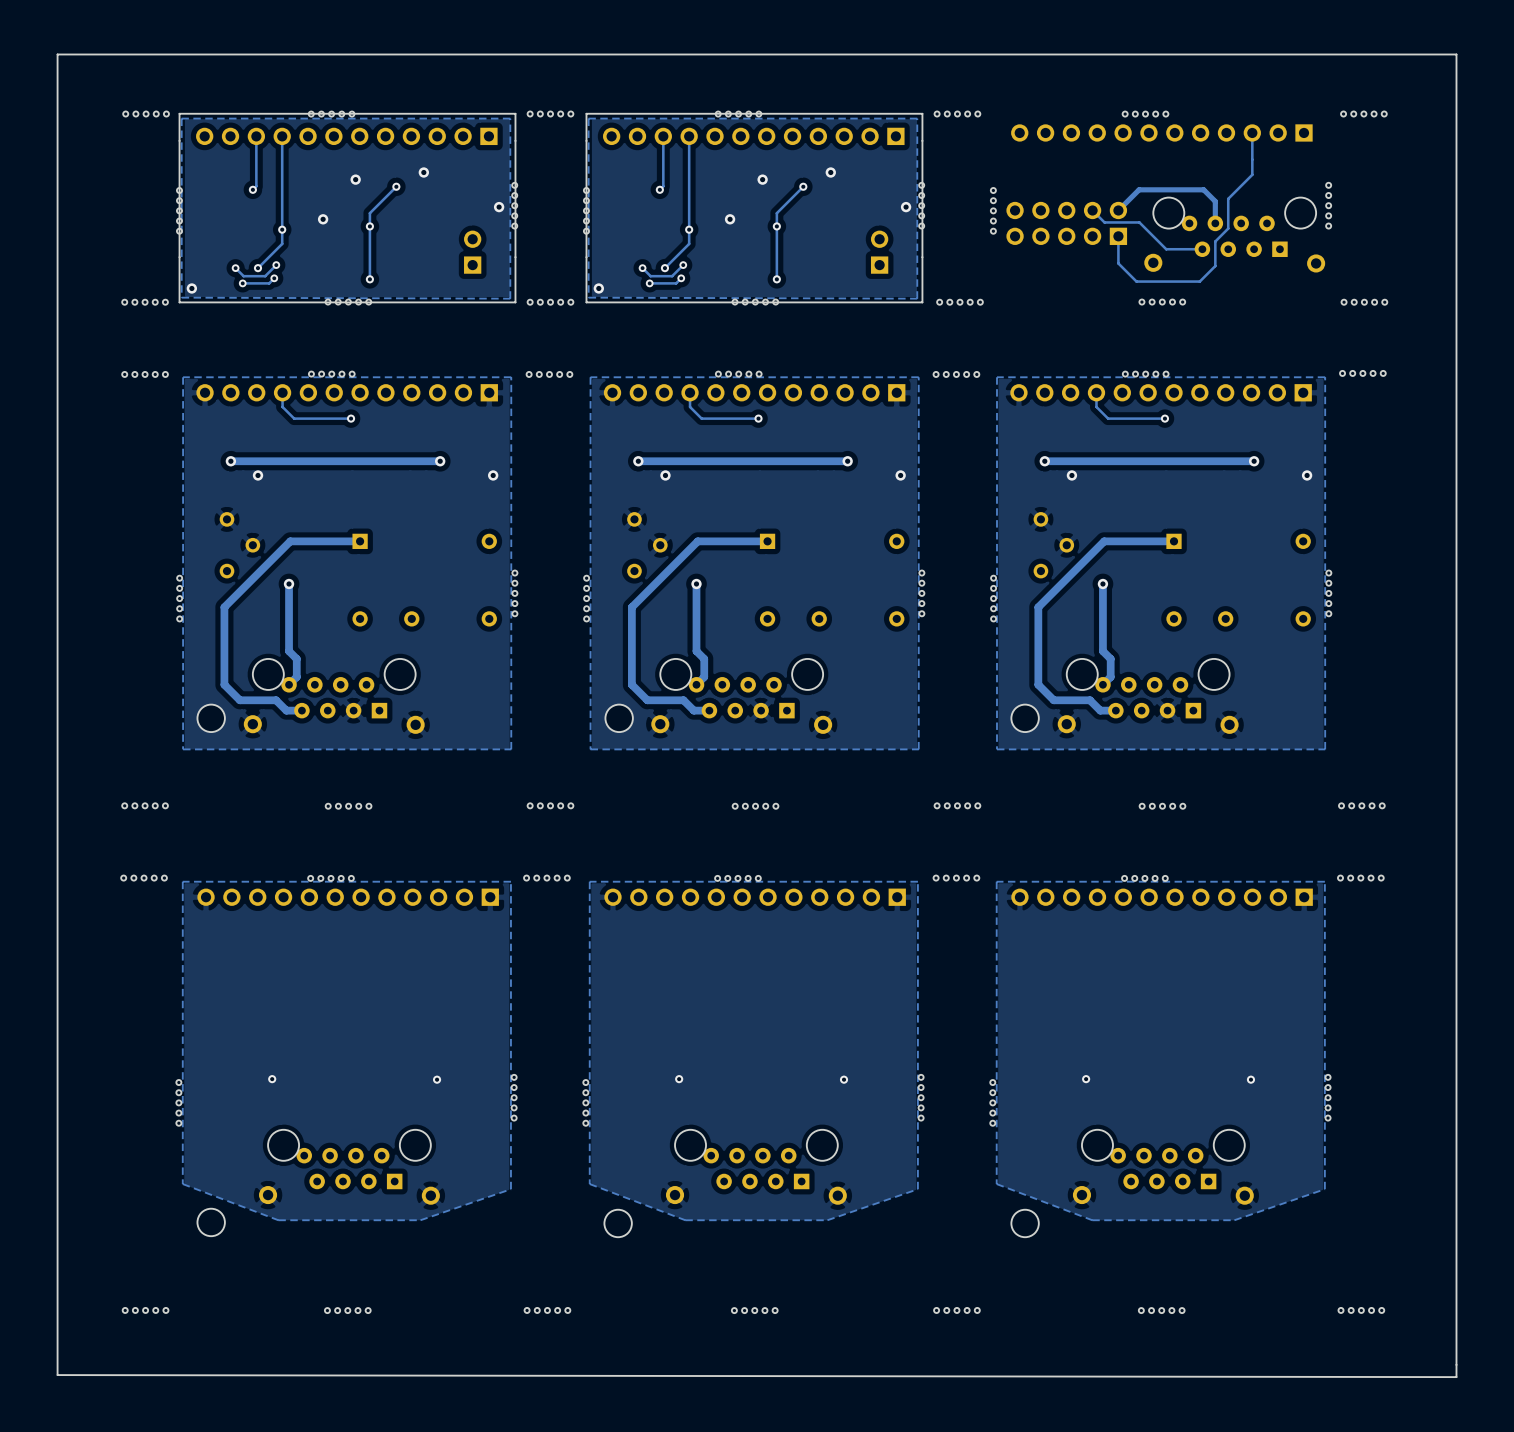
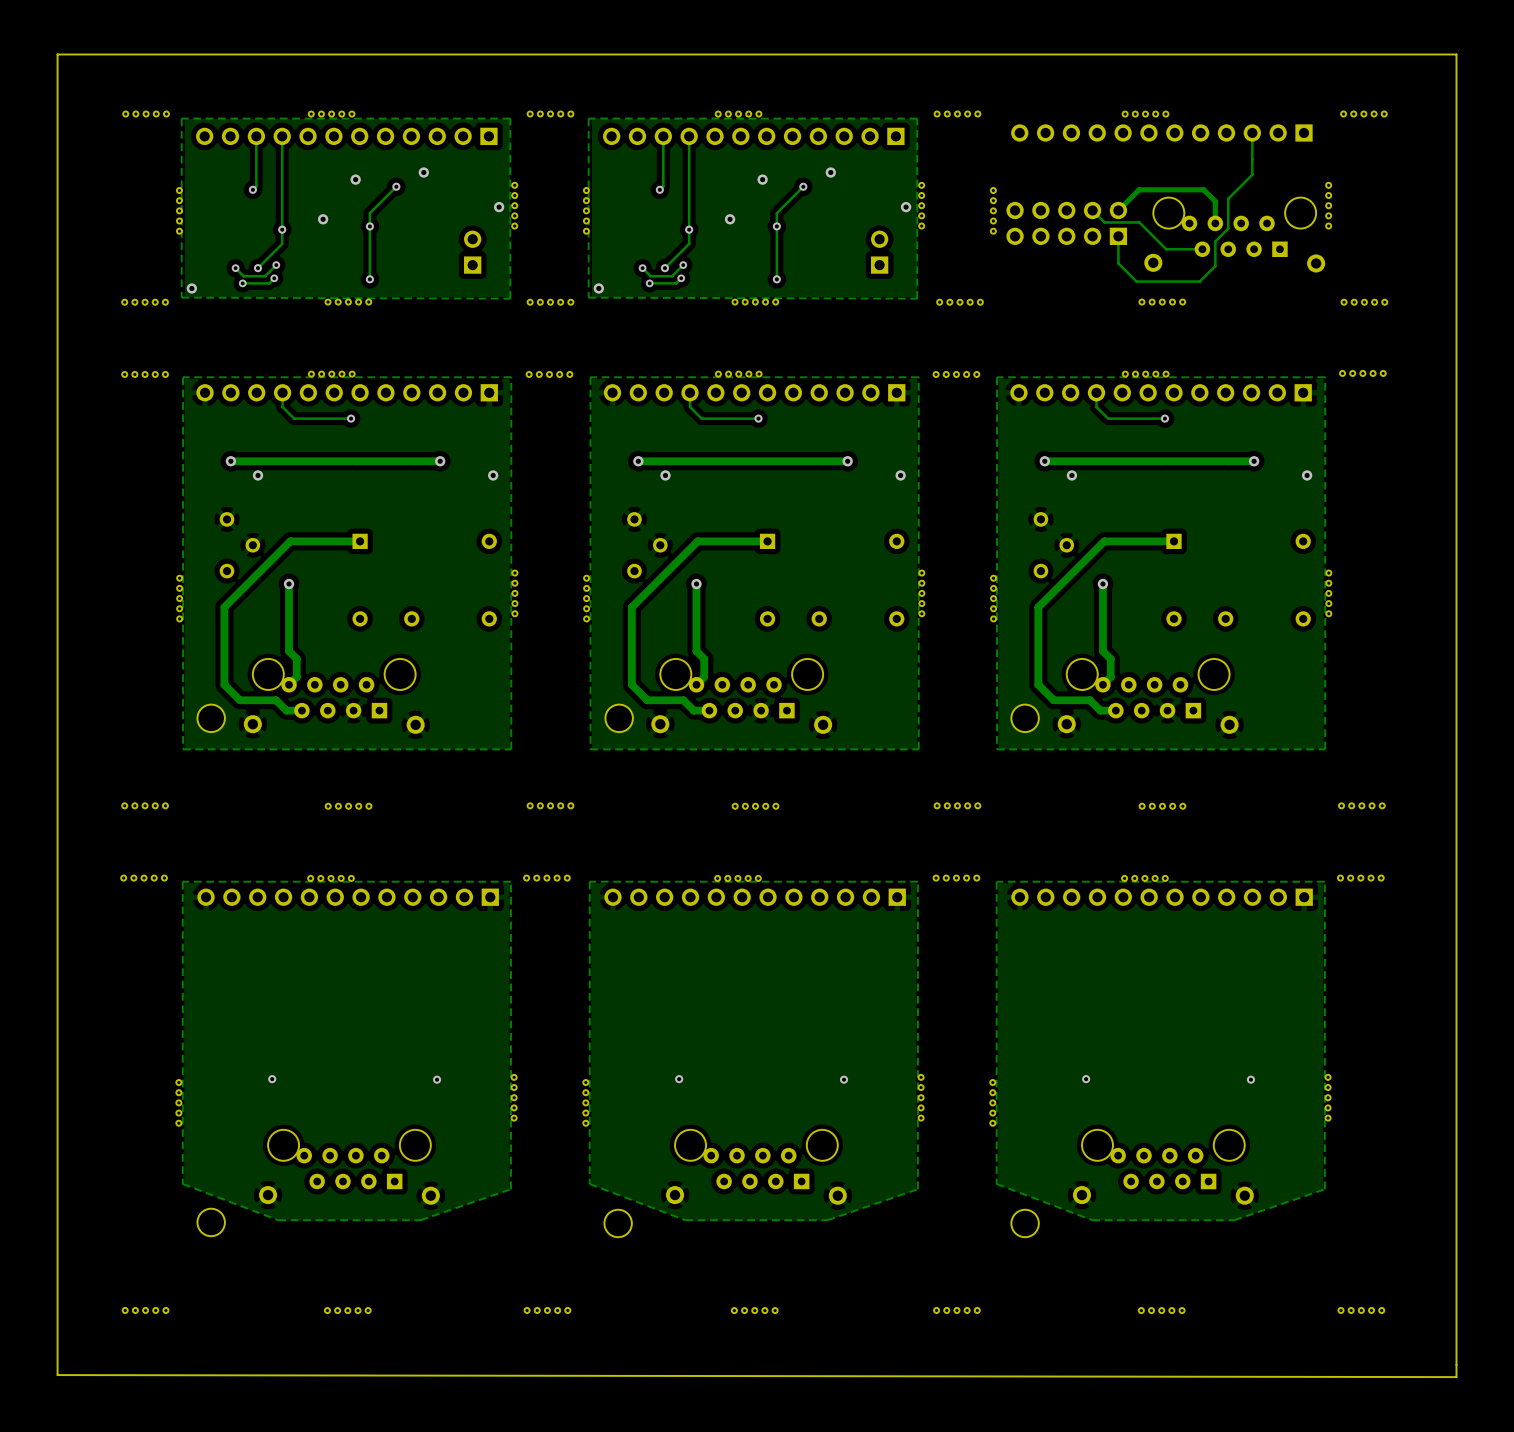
board edge: (515, 113) (515, 302) (179, 302) (179, 113) (515, 113) -> none
board edge: (922, 113) (586, 113) (586, 302) (922, 302) (922, 113) -> none

